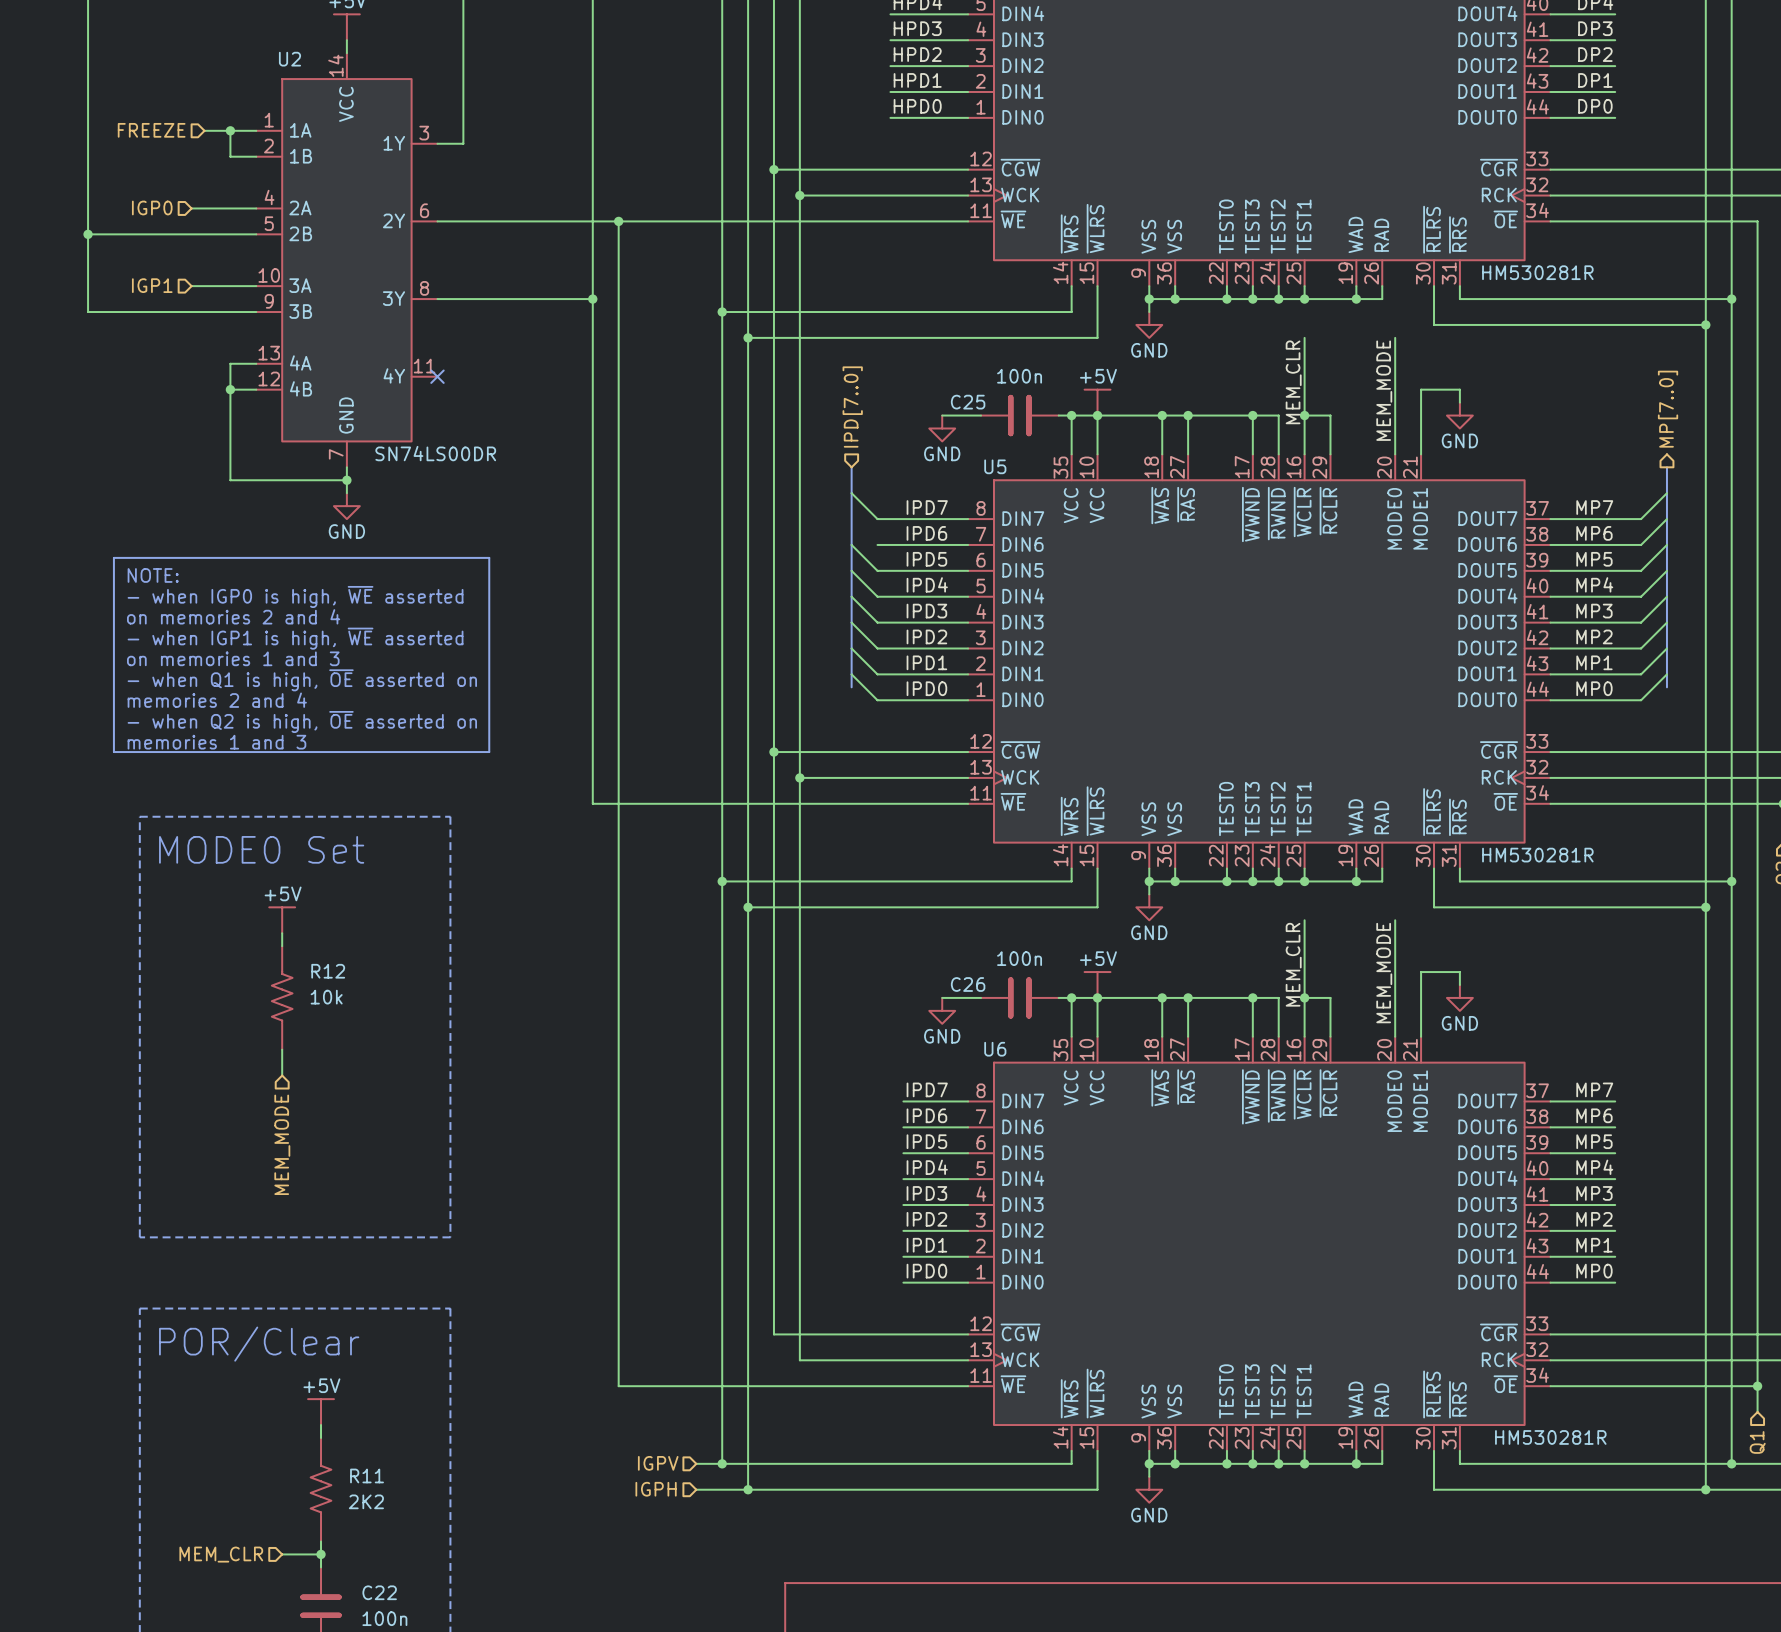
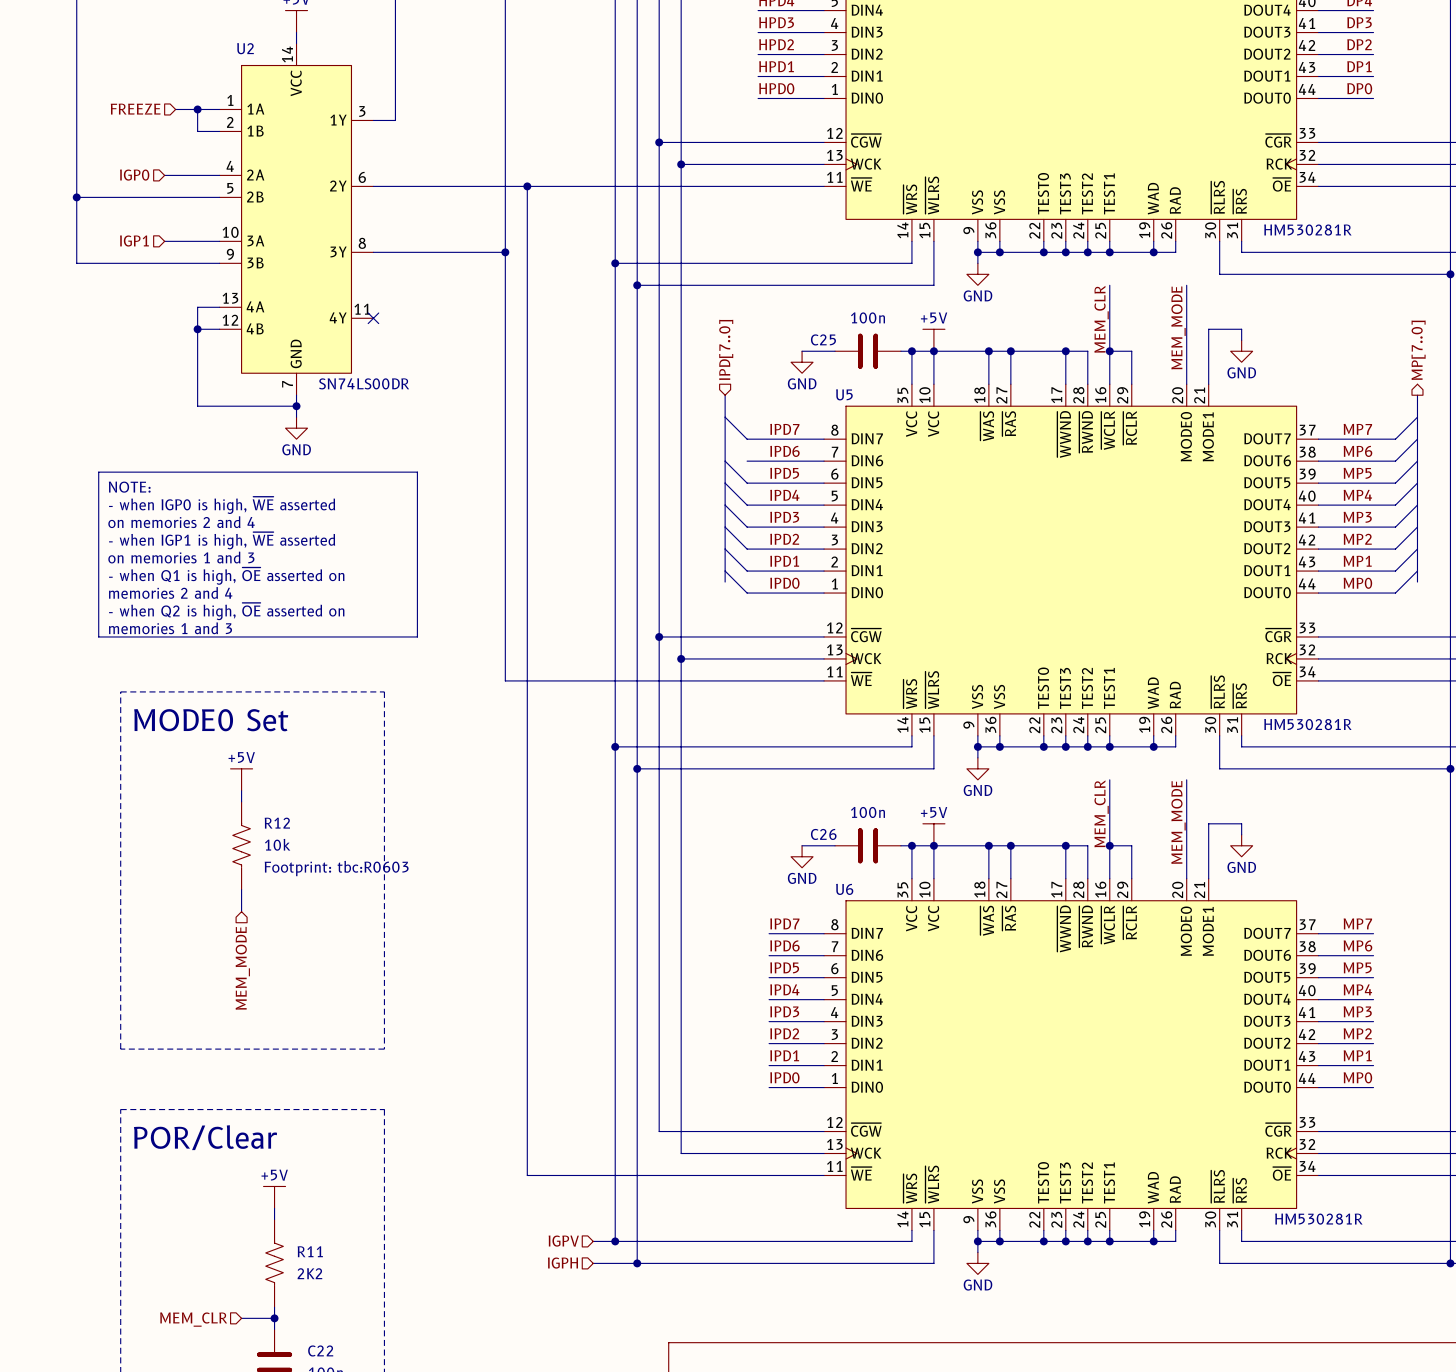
R12 text: none -> Footprint: tbc:R0603 (336, 868)

